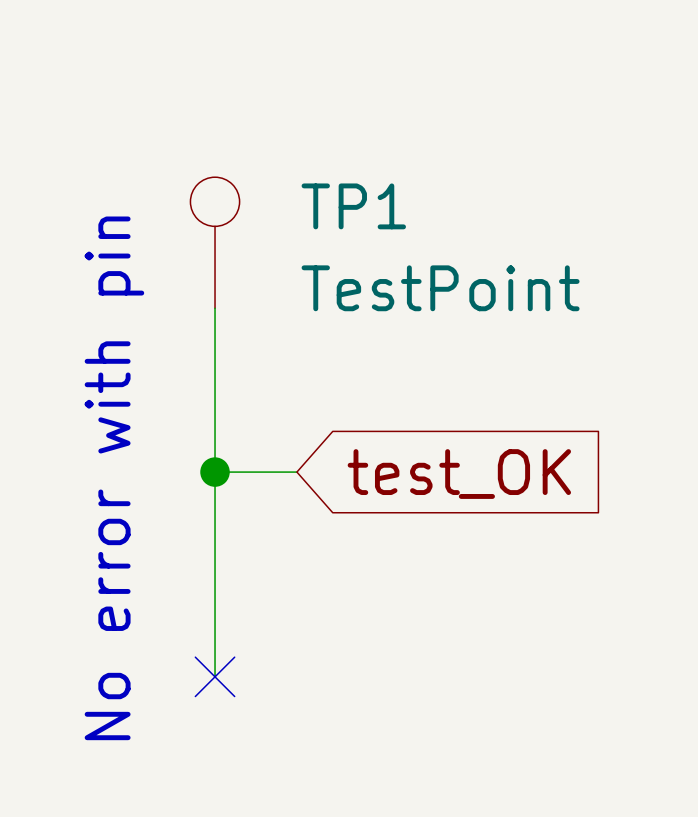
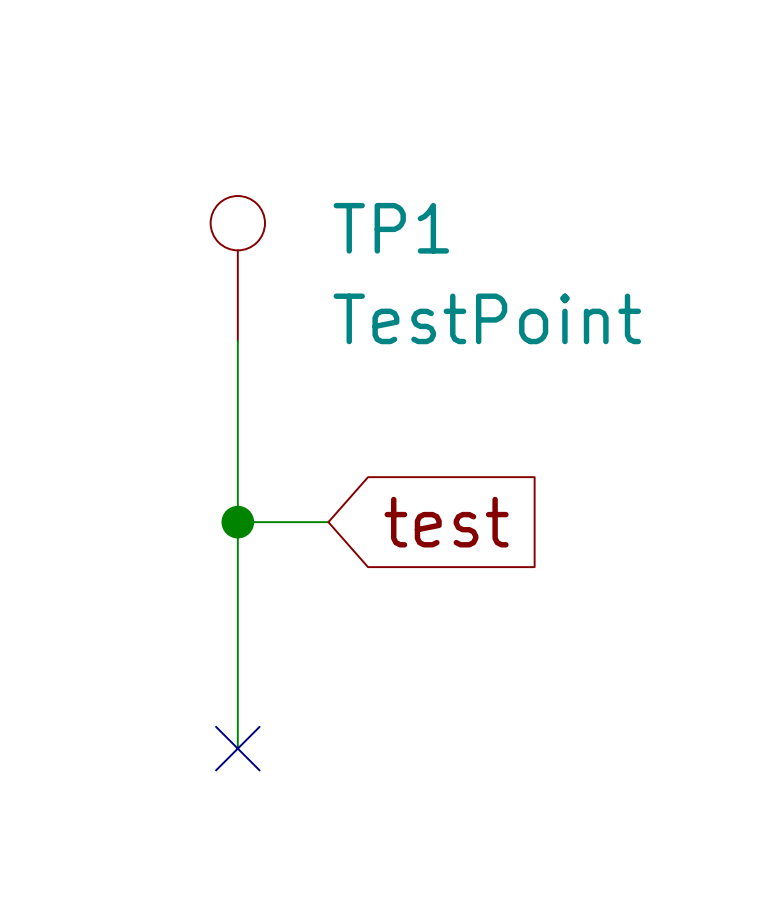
global label: test_OK (459, 474) -> test (446, 522)
text: No error with pin (114, 478) -> none

